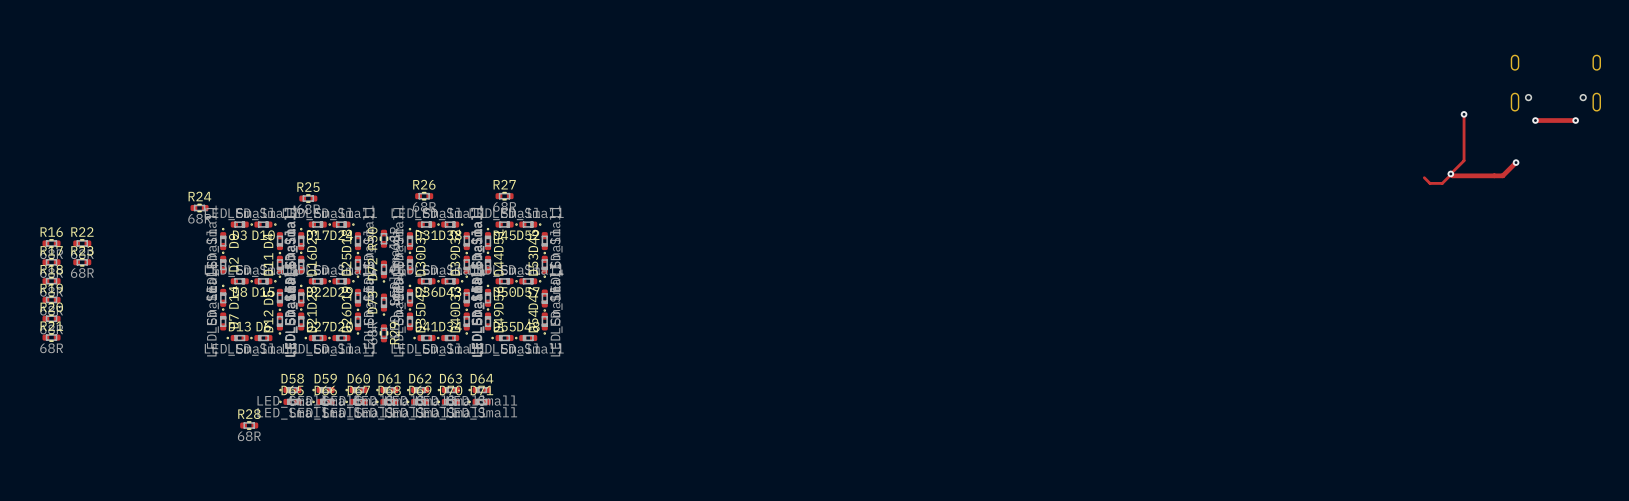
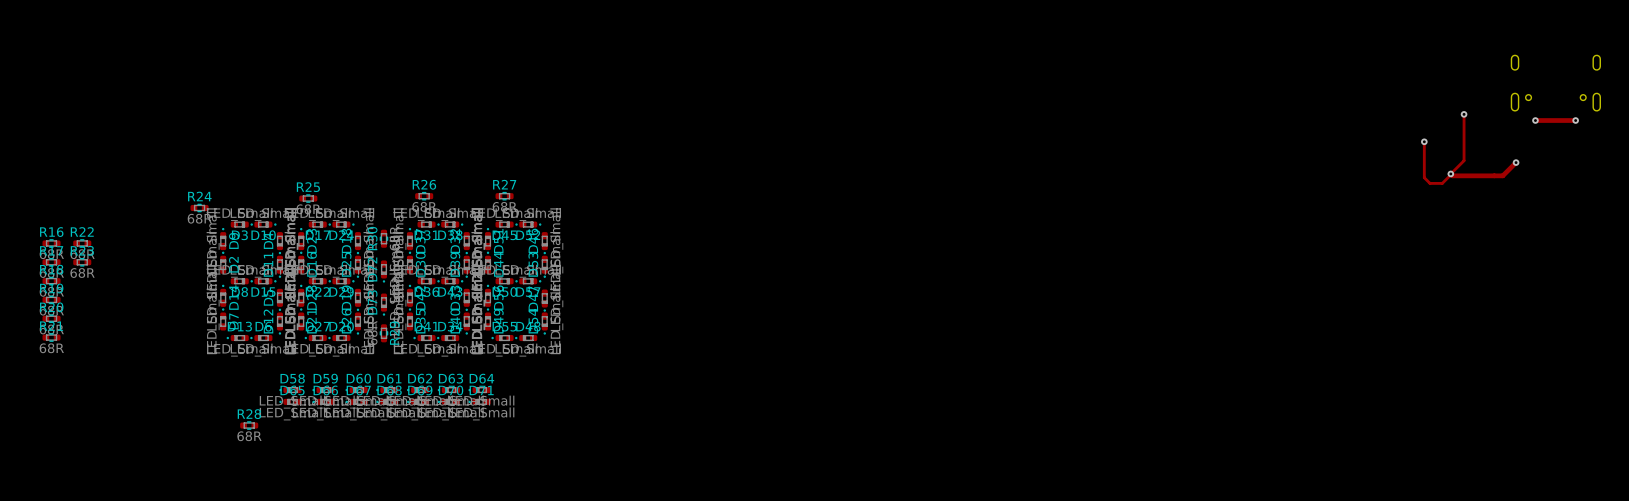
track: none -> (1424, 141) (1424, 177)
via: none -> (1424, 141)

